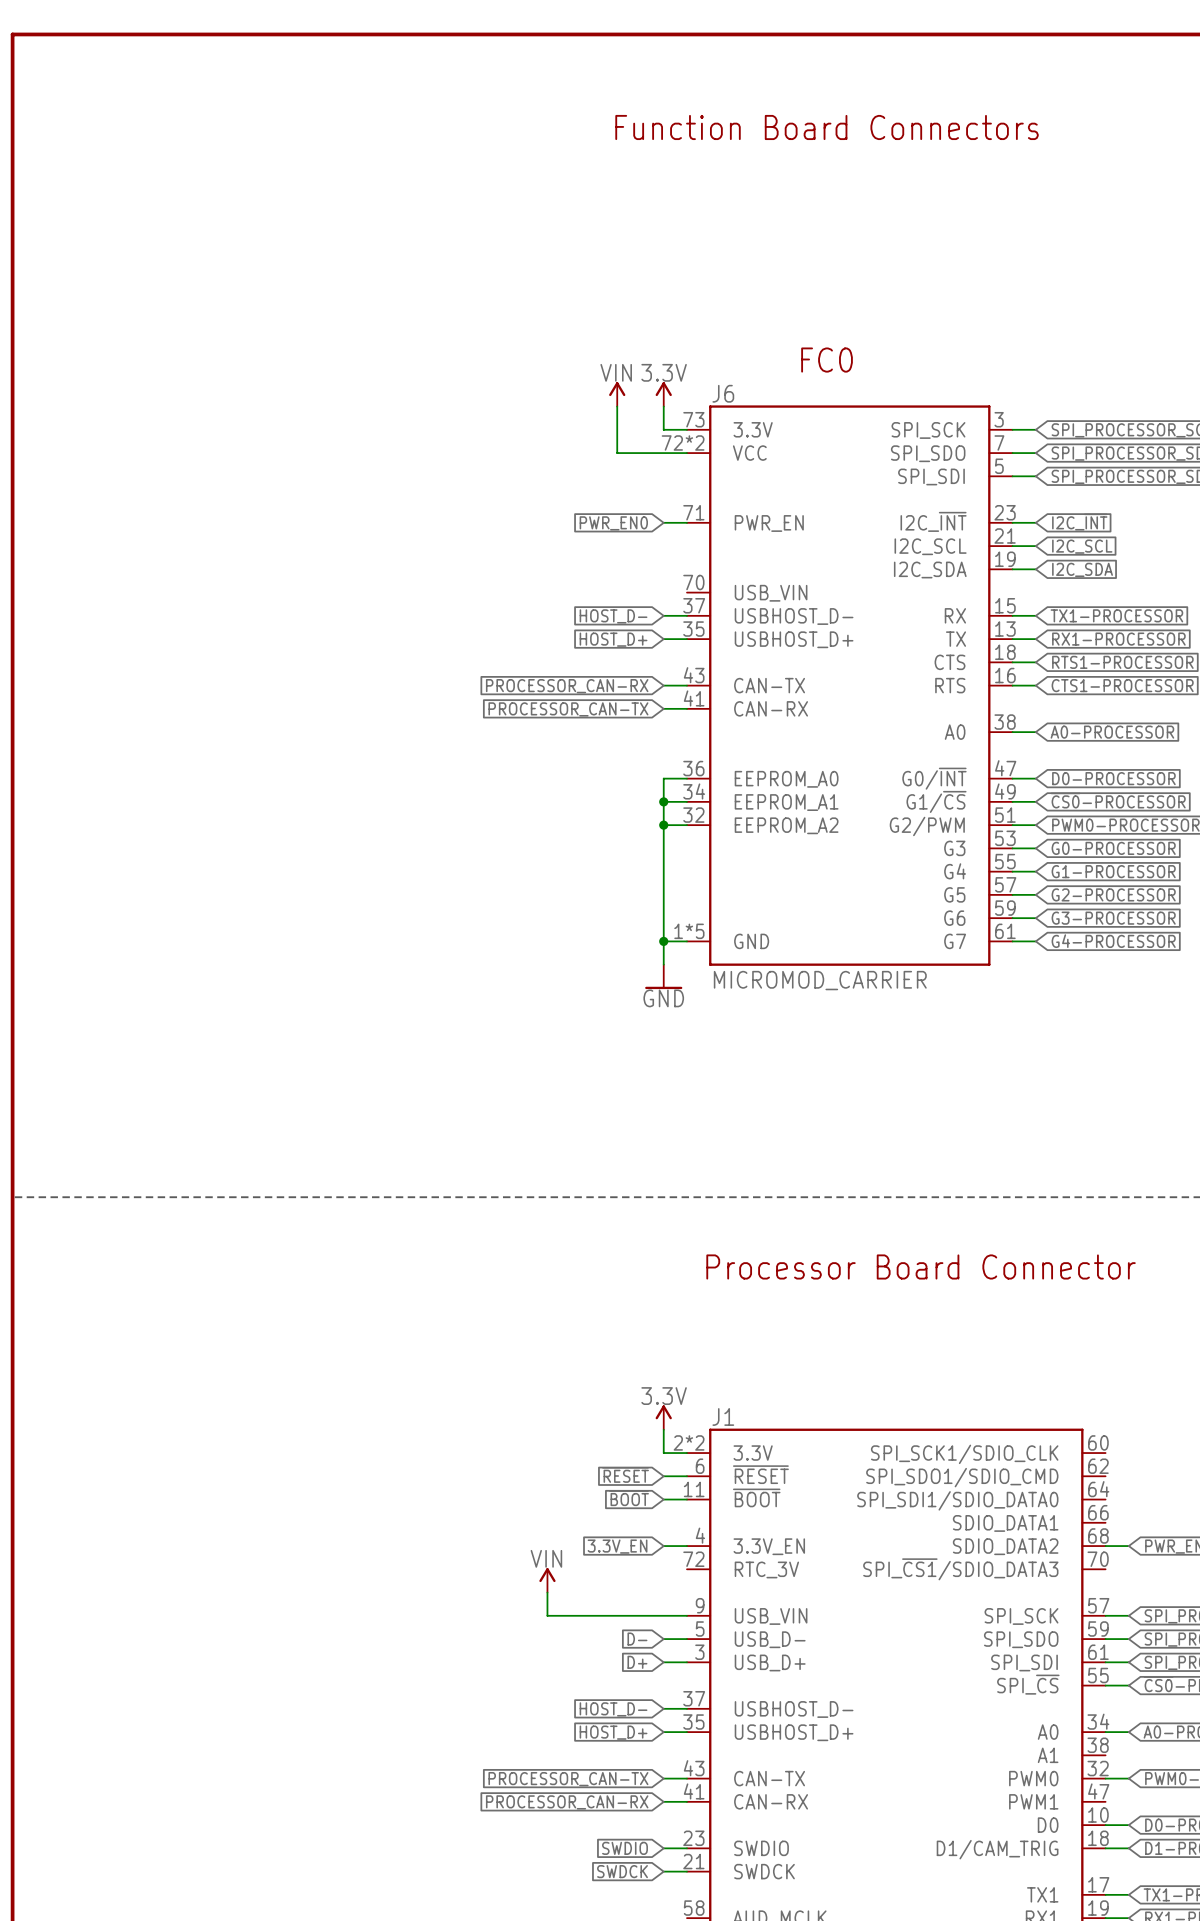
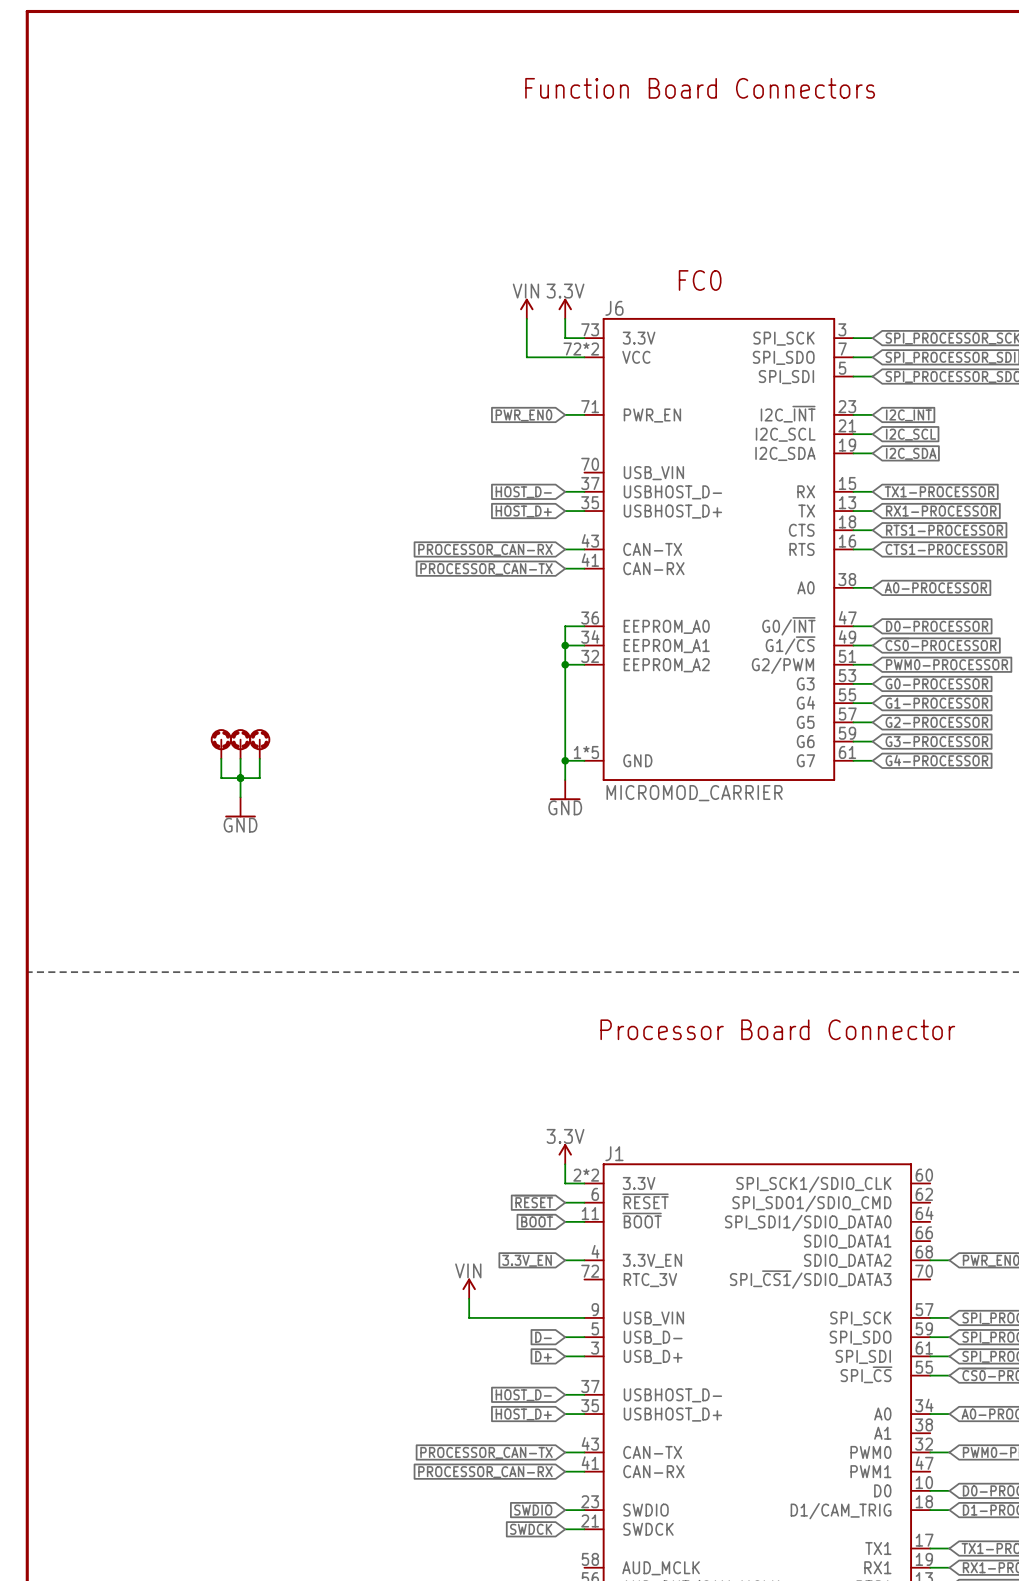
part: none -> (221, 743)
part: none -> (240, 743)
part: none -> (259, 743)
wire: none -> (221, 758) (221, 778) (259, 778) (259, 758)
wire: none -> (240, 758) (240, 797)
junction: none -> (240, 778)
power symbol: none -> GND (240, 807)

